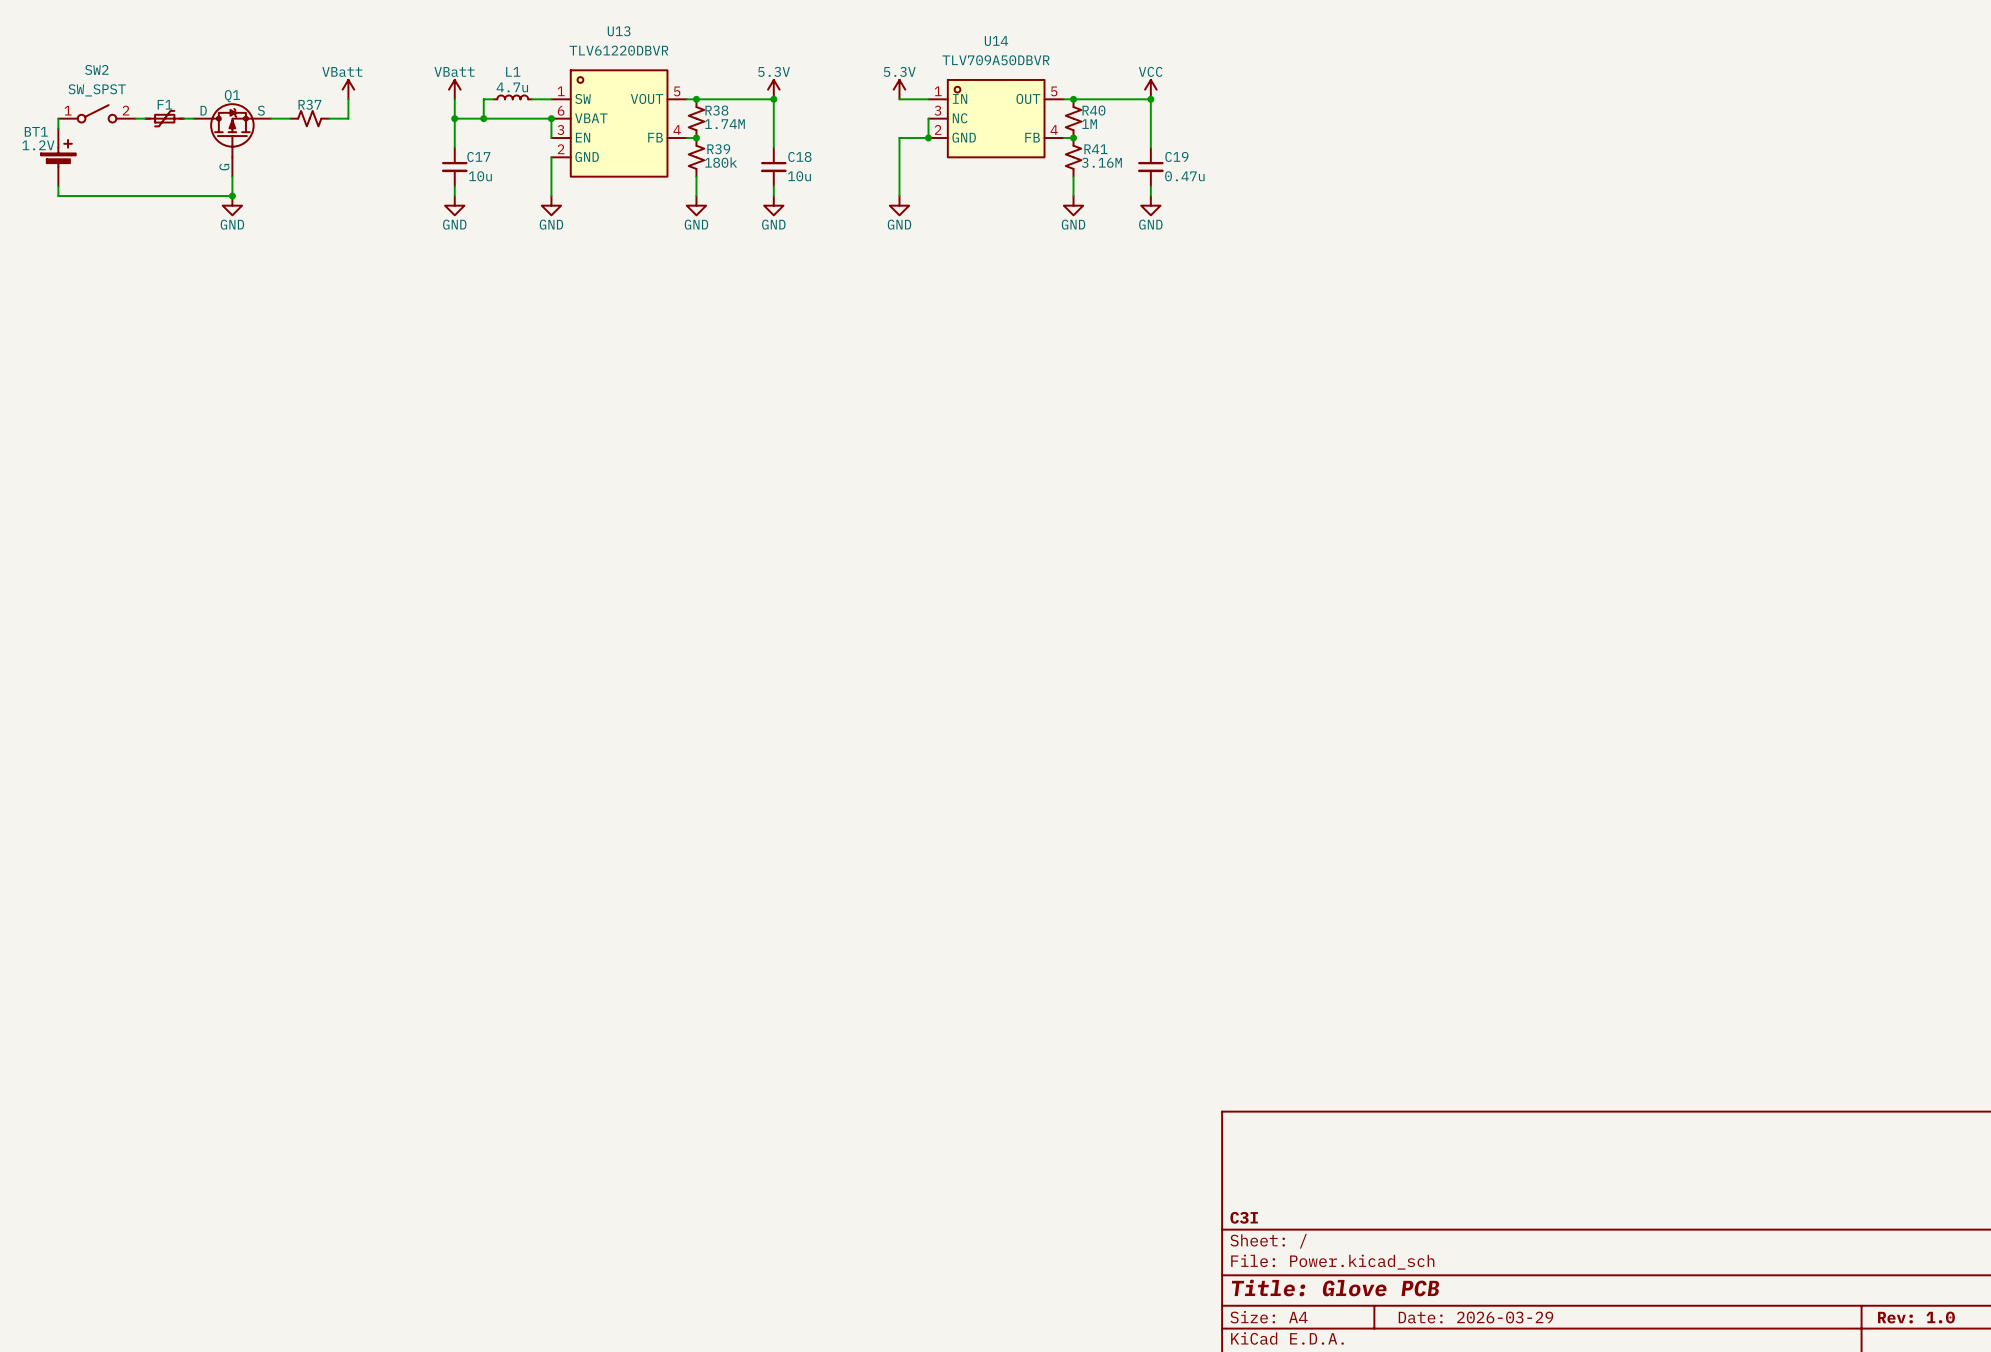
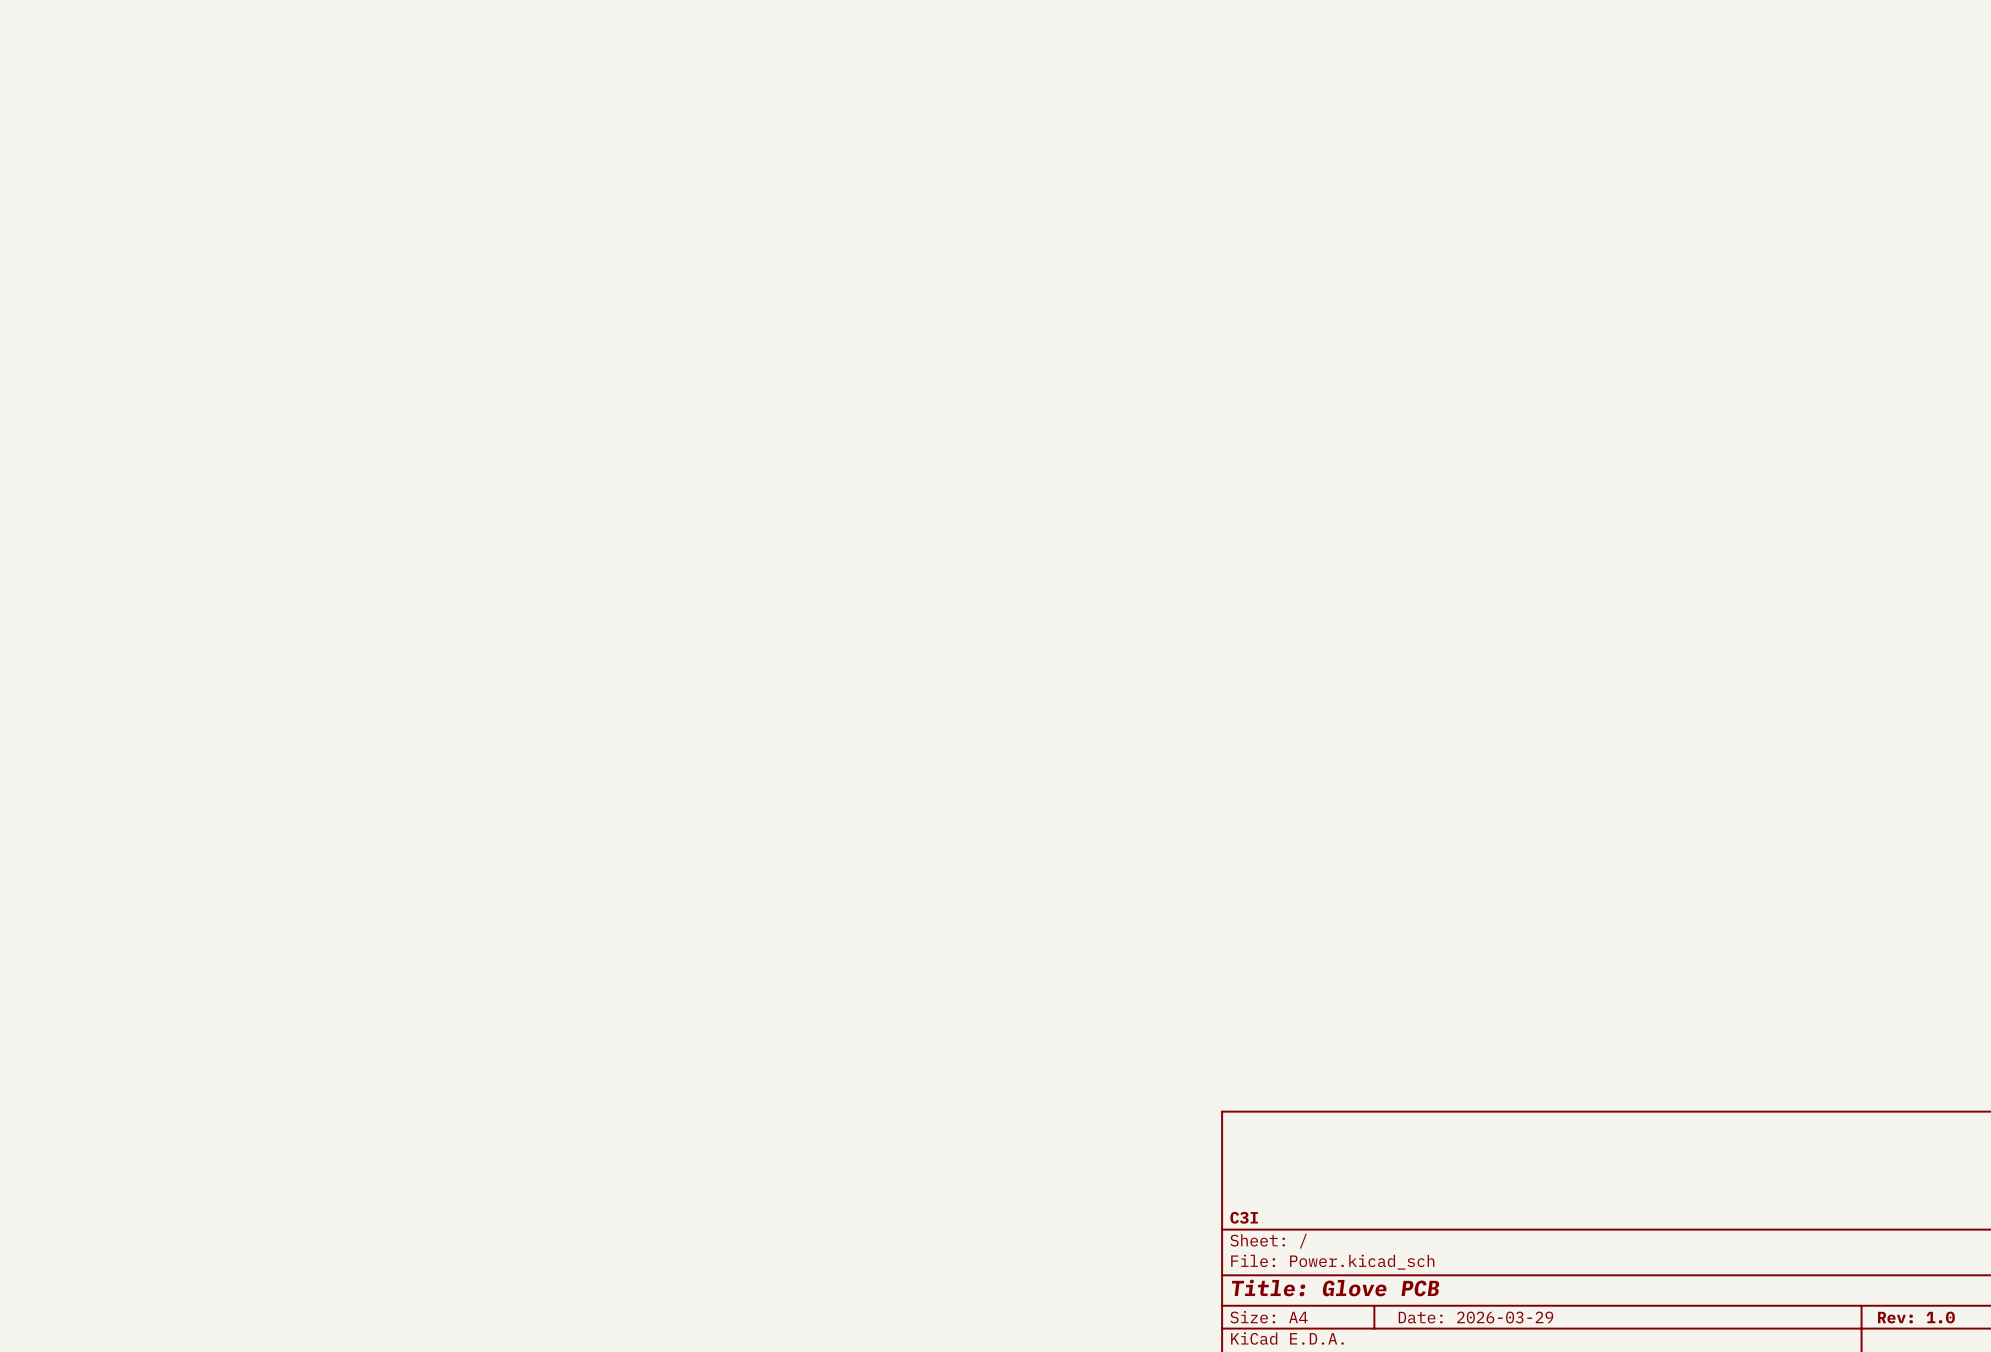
power symbol: VBatt (348, 89) -> none
power symbol: VBatt (454, 89) -> none
power symbol: 5.3V (773, 89) -> none
power symbol: 5.3V (899, 89) -> none
power symbol: VCC (1150, 89) -> none
L1: 4.7u (512, 97) -> none
wire: (348, 99) (348, 118) (329, 118) -> none
wire: (454, 99) (454, 147) -> none
wire: (493, 99) (483, 99) (483, 118) -> none
wire: (532, 99) (551, 99) -> none
wire: (686, 99) (773, 99) (773, 147) -> none
junction: (696, 99) -> none
junction: (773, 99) -> none
wire: (899, 99) (928, 99) -> none
wire: (1063, 99) (1150, 99) (1150, 147) -> none
junction: (1073, 99) -> none
junction: (1150, 99) -> none
SW2: SW_SPST (97, 113) -> none
wire: (58, 118) (58, 128) -> none
wire: (135, 118) (145, 118) -> none
F1: (164, 118) -> none
wire: (184, 118) (193, 118) -> none
wire: (271, 118) (290, 118) -> none
R37: (309, 118) -> none
wire: (454, 118) (551, 118) (551, 137) -> none
junction: (454, 118) -> none
junction: (483, 118) -> none
junction: (551, 118) -> none
R38: 1.74M (696, 118) -> none
wire: (928, 118) (928, 137) (899, 137) (899, 196) -> none
U14: TLV709A50DBVR (996, 118) -> none
R40: 1M (1073, 118) -> none
U13: TLV61220DBVR (619, 123) -> none
wire: (686, 137) (696, 137) -> none
junction: (696, 137) -> none
junction: (928, 137) -> none
wire: (1063, 137) (1073, 137) -> none
junction: (1073, 137) -> none
Q1: (232, 139) -> none
BT1: 1.2V (58, 157) -> none
wire: (551, 157) (551, 196) -> none
R39: 180k (696, 157) -> none
R41: 3.16M (1073, 157) -> none
C17: 10u (454, 166) -> none
C18: 10u (773, 166) -> none
C19: 0.47u (1150, 166) -> none
wire: (232, 176) (232, 196) (58, 196) (58, 186) -> none
wire: (696, 176) (696, 196) -> none
wire: (1073, 176) (1073, 196) -> none
wire: (454, 186) (454, 196) -> none
wire: (773, 186) (773, 196) -> none
wire: (1150, 186) (1150, 196) -> none
junction: (232, 196) -> none
power symbol: GND (232, 205) -> none
power symbol: GND (454, 205) -> none
power symbol: GND (551, 205) -> none
power symbol: GND (696, 205) -> none
power symbol: GND (773, 205) -> none
power symbol: GND (899, 205) -> none
power symbol: GND (1073, 205) -> none
power symbol: GND (1150, 205) -> none

